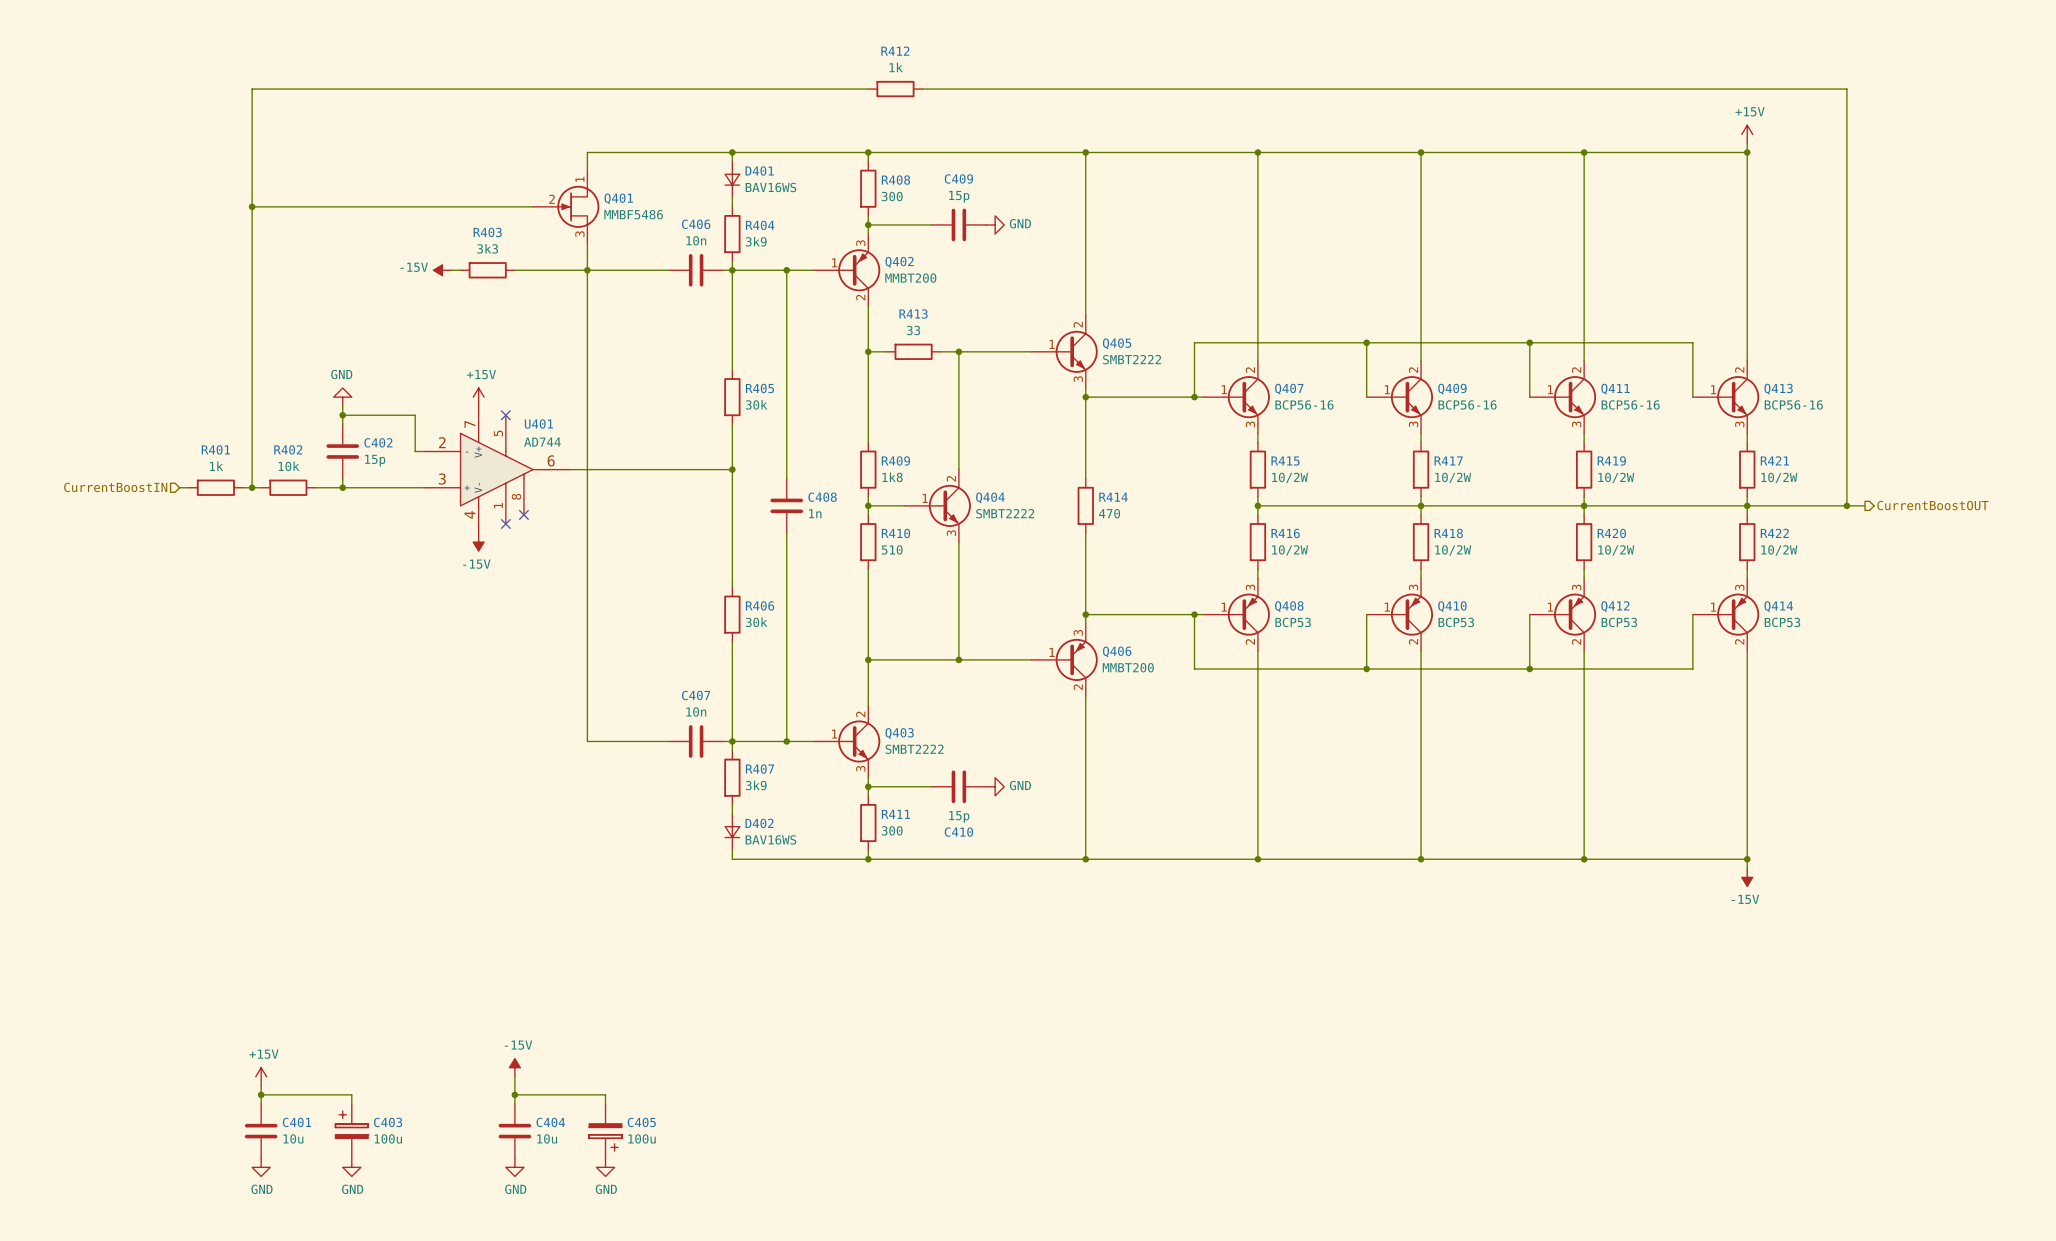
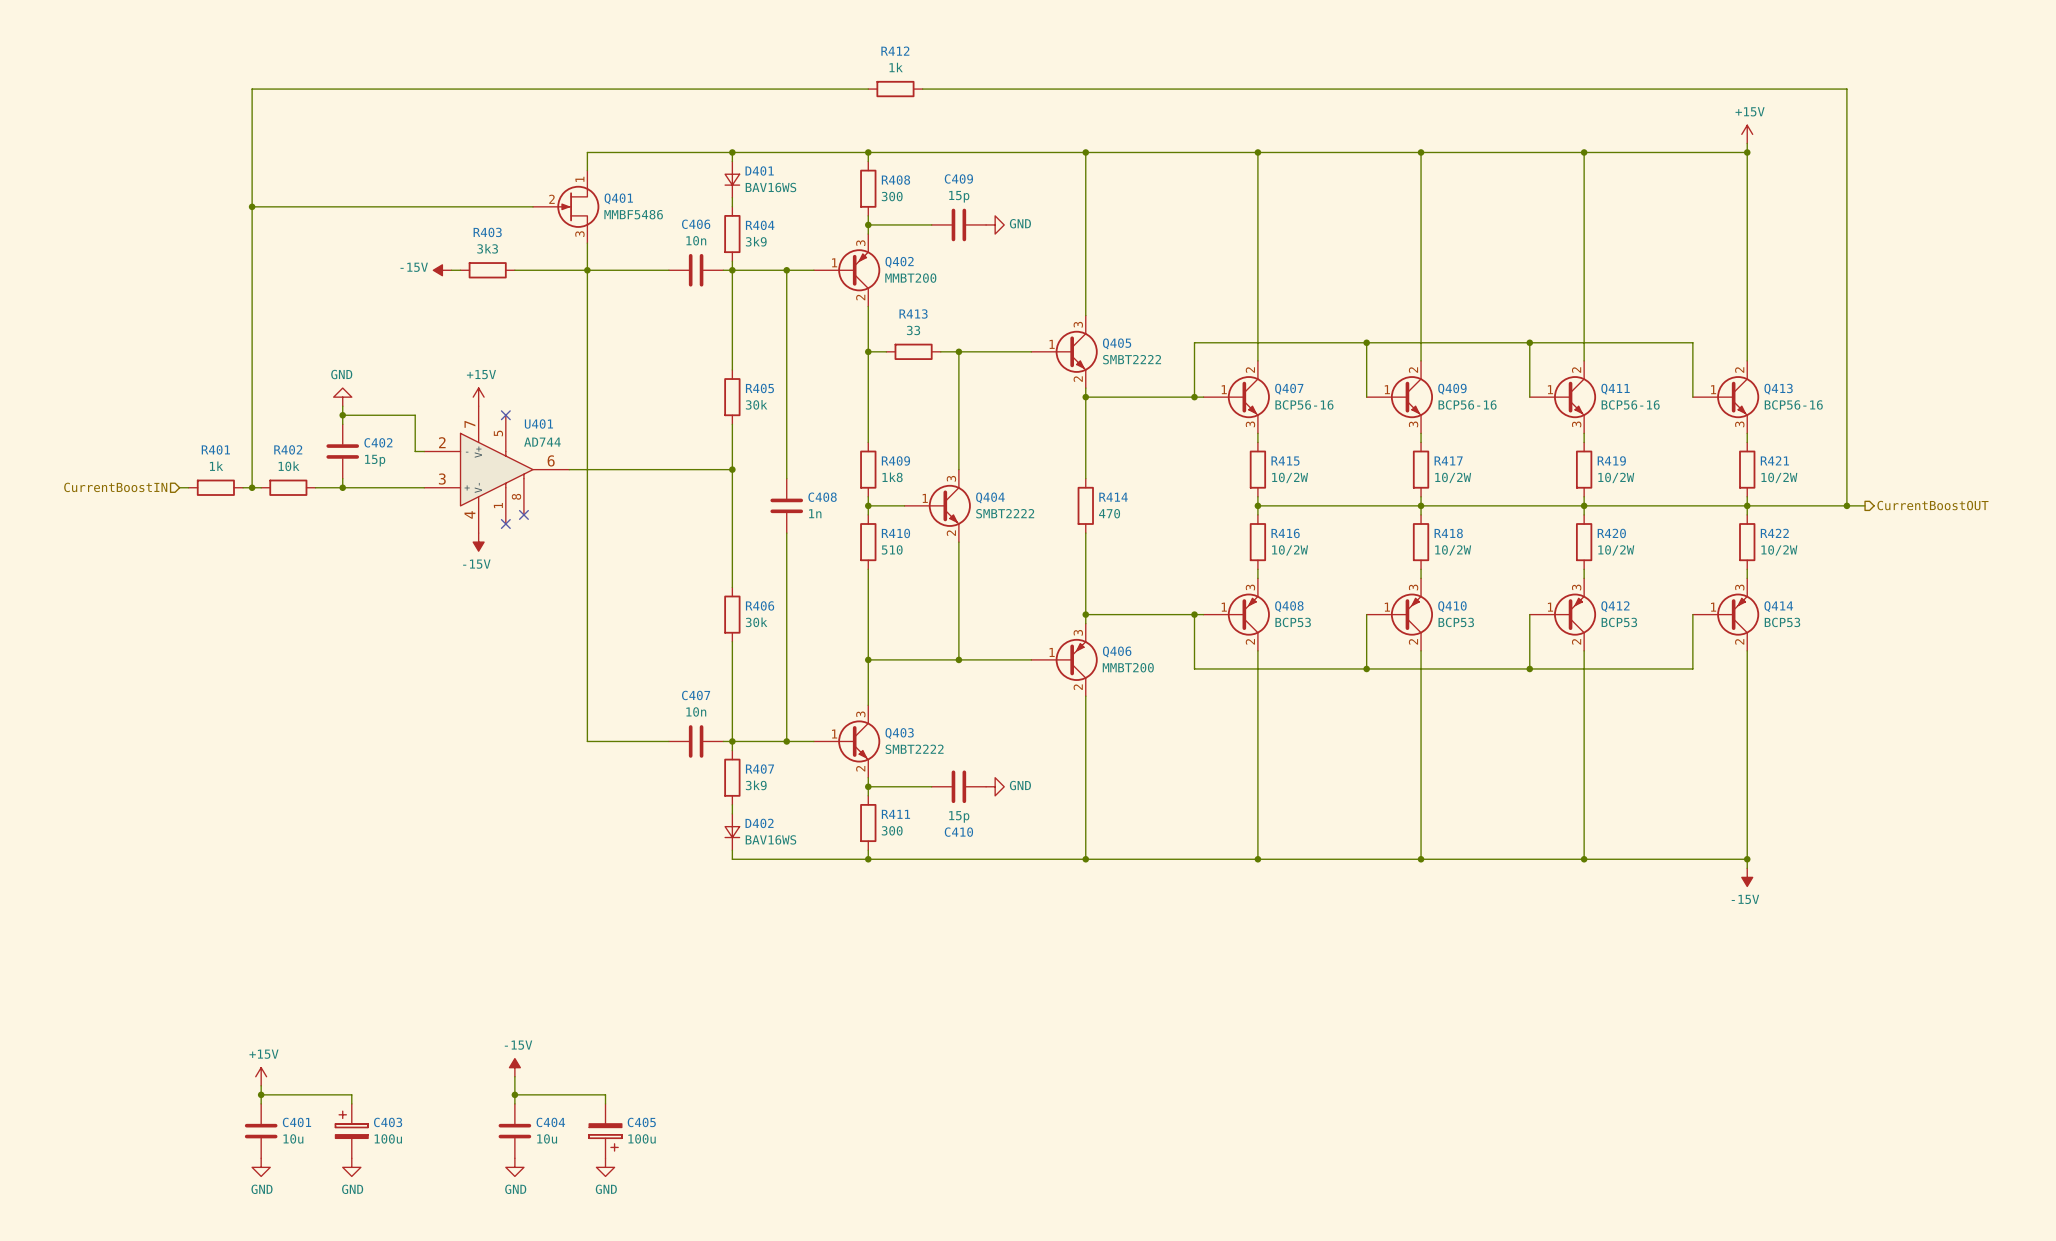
Q405 pin number: 2 (1078, 324) -> 3 (1078, 324)
Q405 pin number: 3 (1078, 379) -> 2 (1078, 379)
Q404 pin number: 2 (951, 478) -> 3 (951, 478)
Q404 pin number: 3 (951, 533) -> 2 (951, 533)
Q403 pin number: 2 (860, 714) -> 3 (860, 714)
Q403 pin number: 3 (860, 768) -> 2 (860, 768)

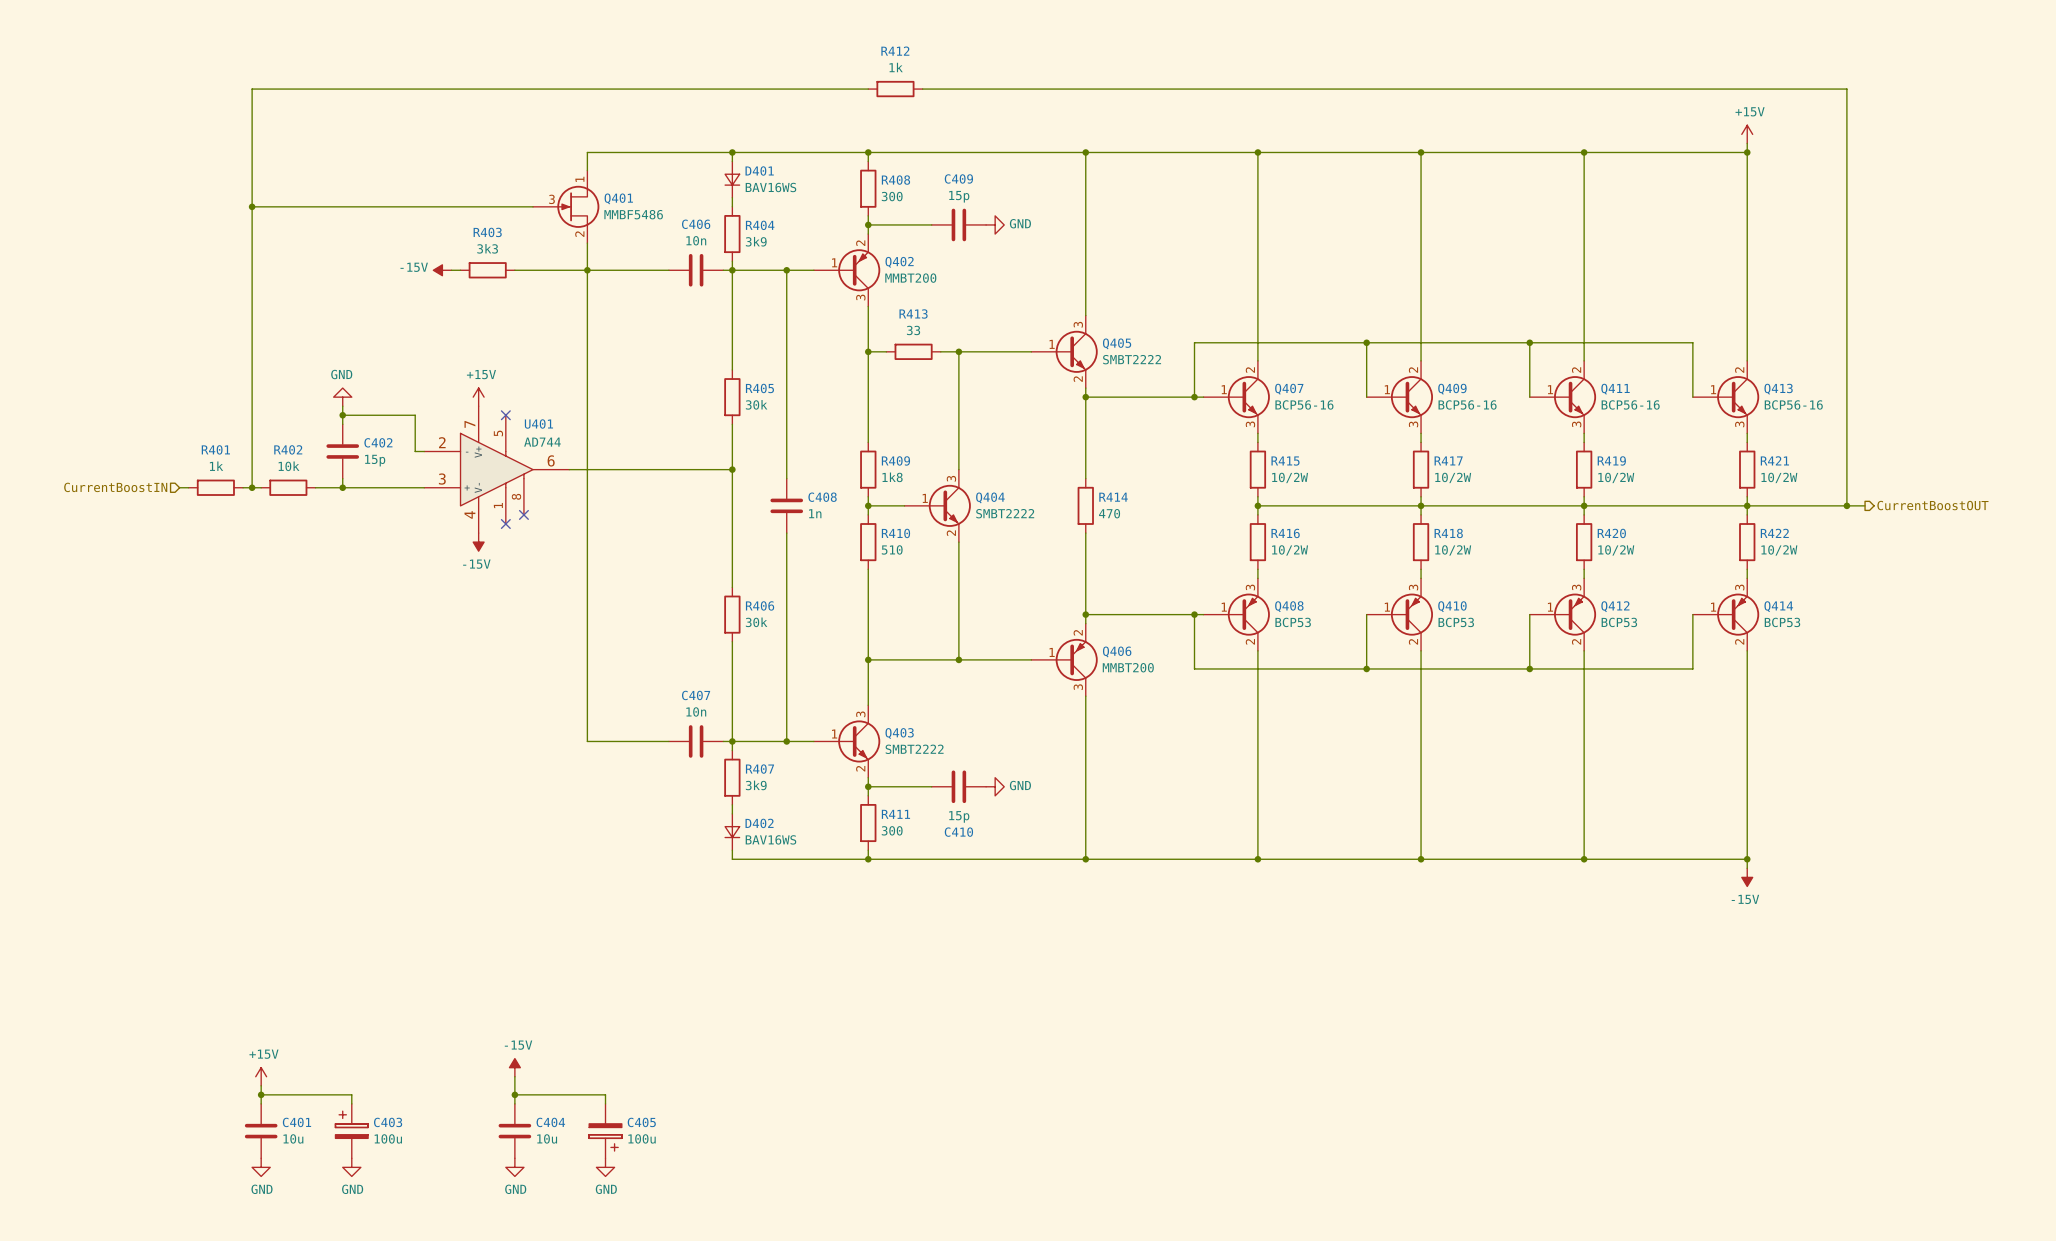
Q401 pin number: 2 (551, 199) -> 3 (551, 199)
Q401 pin number: 3 (579, 234) -> 2 (579, 234)
Q402 pin number: 3 (860, 243) -> 2 (860, 243)
Q402 pin number: 2 (860, 297) -> 3 (860, 297)
Q406 pin number: 3 (1078, 632) -> 2 (1078, 632)
Q406 pin number: 2 (1078, 687) -> 3 (1078, 687)

